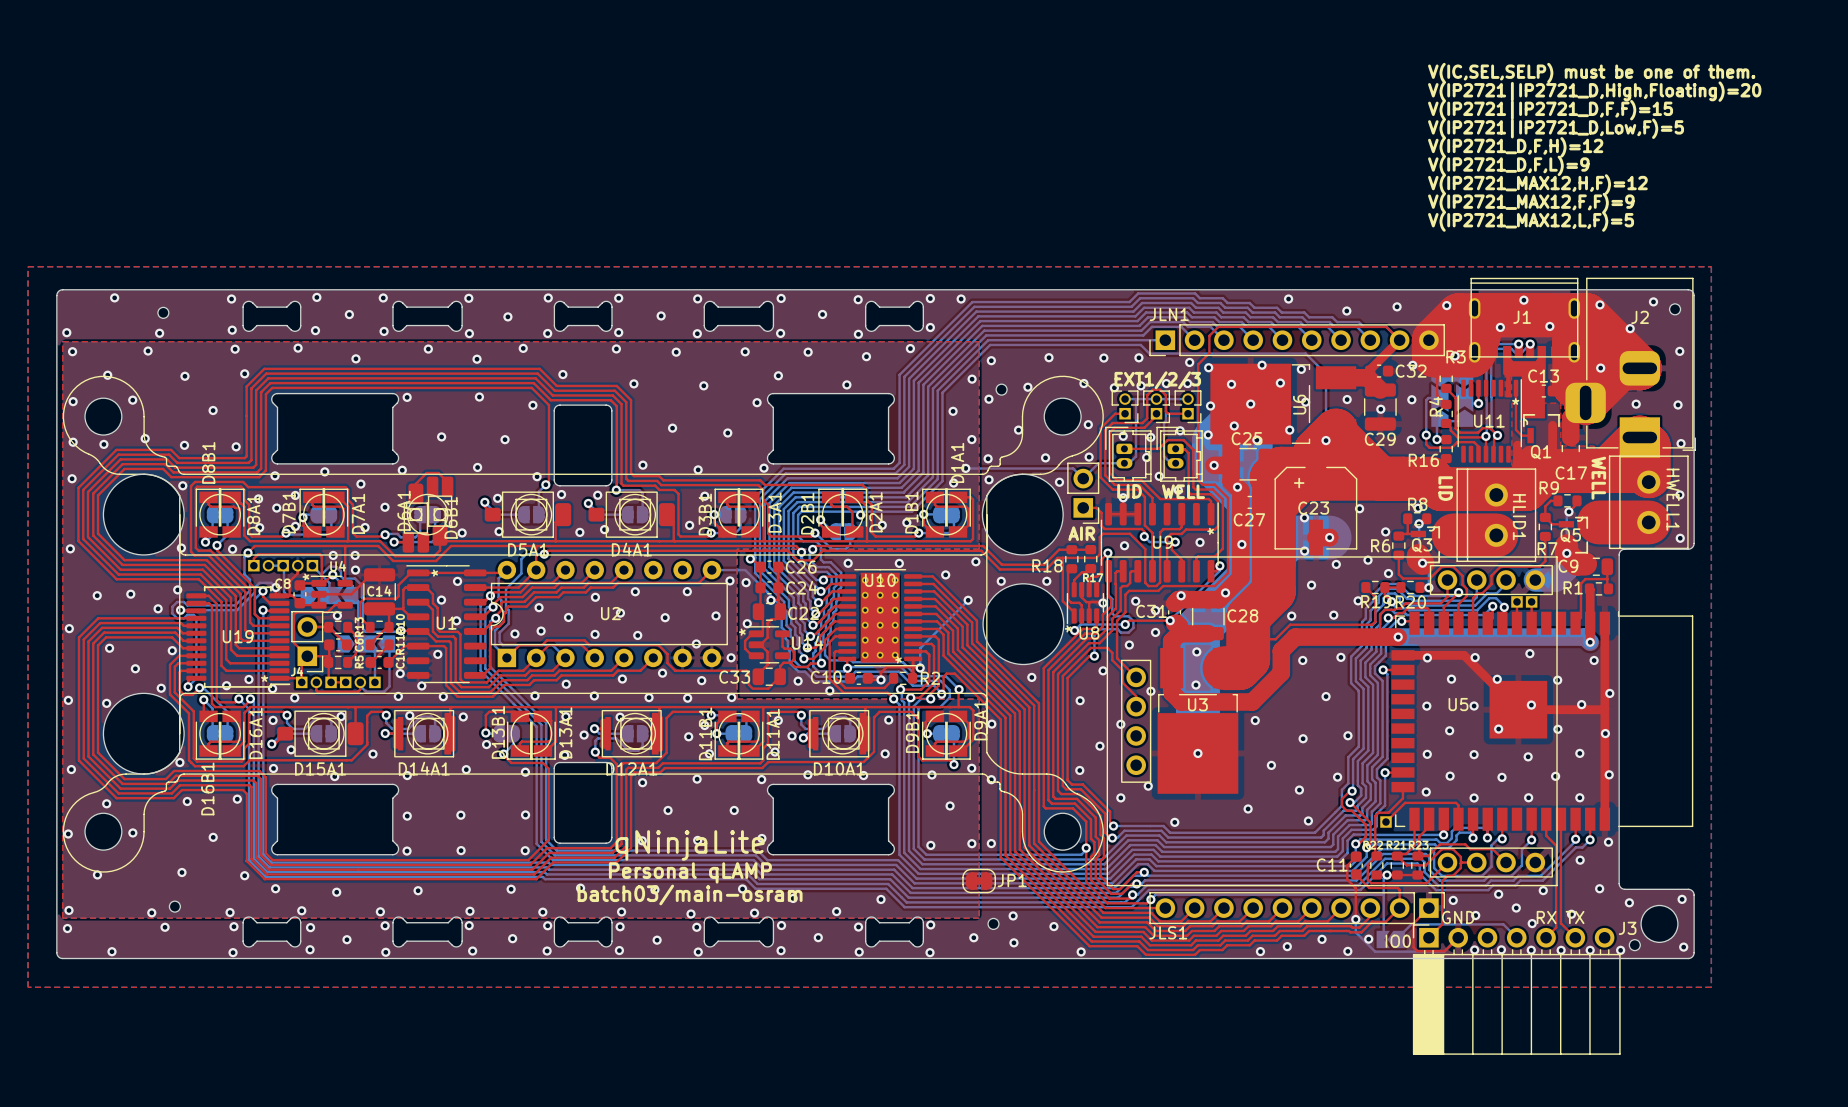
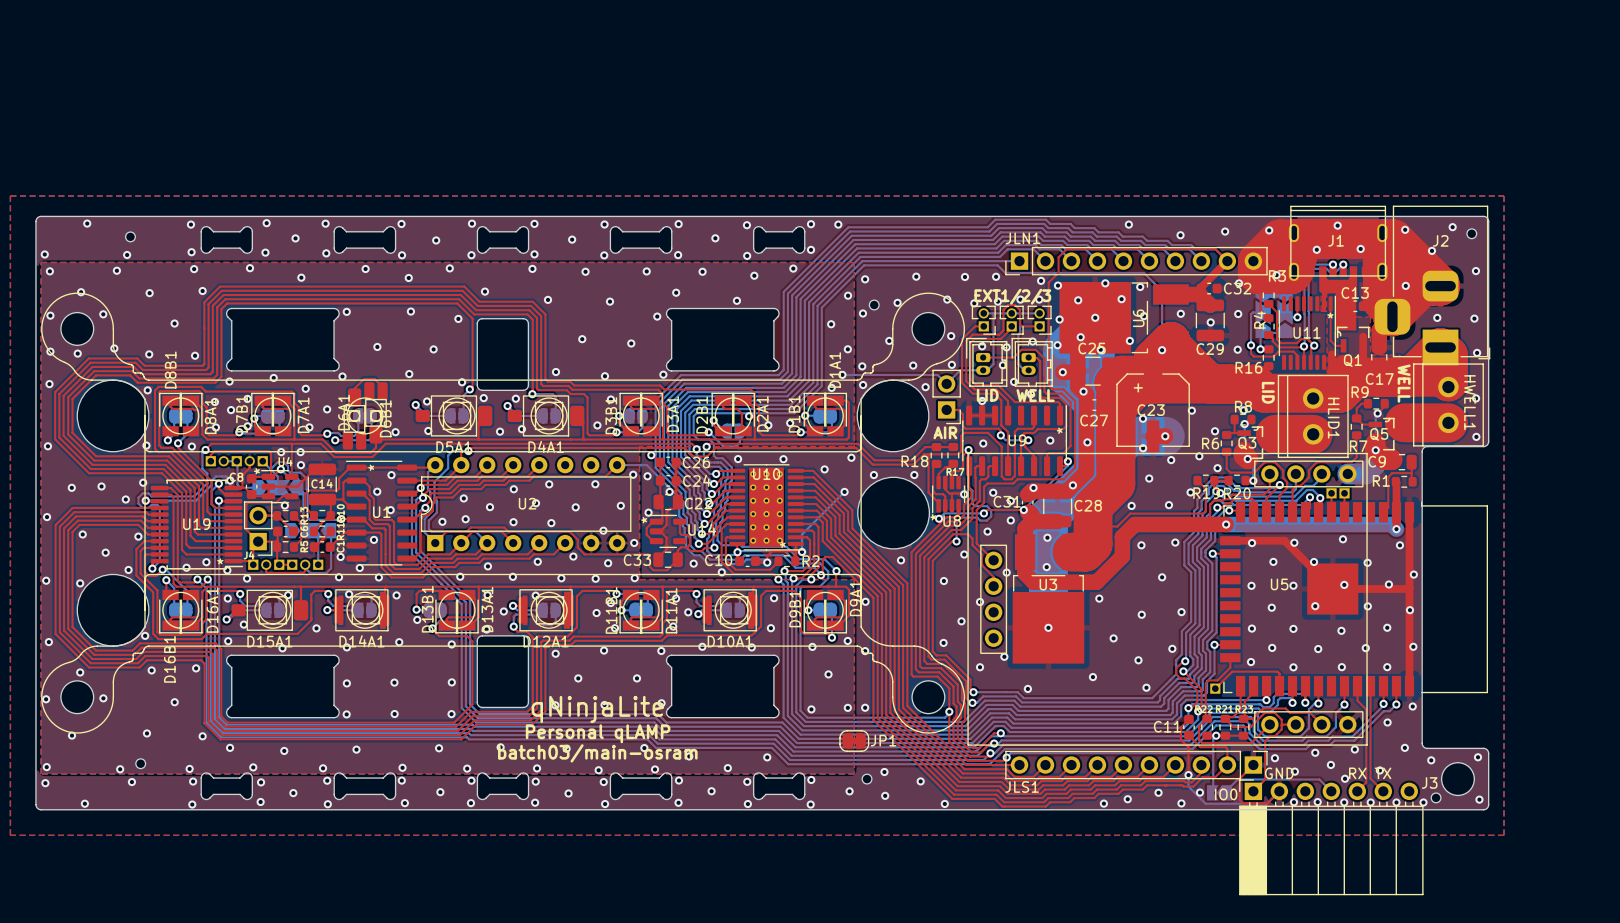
text: V(IC,SEL,SELP) must be one of them. (1591, 73) -> none
text: V(IP2721|IP2721_D,High,Floating)=20 (1594, 91) -> none
text: V(IP2721|IP2721_D,F,F)=15 (1550, 110) -> none
text: V(IP2721|IP2721_D,Low,F)=5 (1556, 128) -> none
text: V(IP2721_D,F,H)=12 (1515, 147) -> none
text: V(IP2721_D,F,L)=9 (1508, 165) -> none
text: V(IP2721_MAX12,H,F)=12 (1537, 184) -> none
text: V(IP2721_MAX12,F,F)=9 (1531, 202) -> none
text: V(IP2721_MAX12,L,F)=5 (1531, 221) -> none

